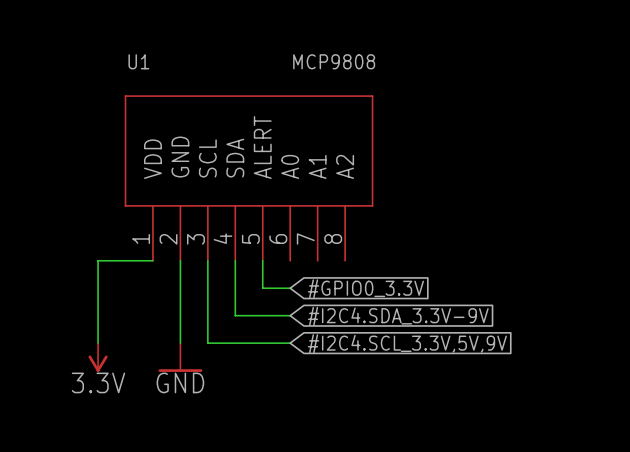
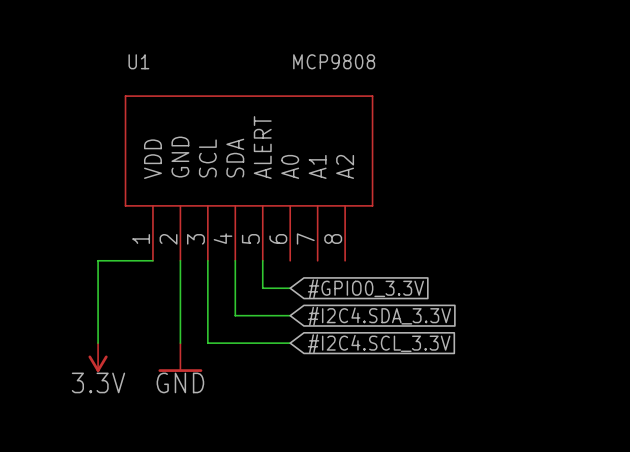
global label: #I2C4.SDA_3.3V-9V (398, 316) -> #I2C4.SDA_3.3V (379, 316)
global label: #I2C4.SCL_3.3V,5V,9V (407, 343) -> #I2C4.SCL_3.3V (379, 343)

